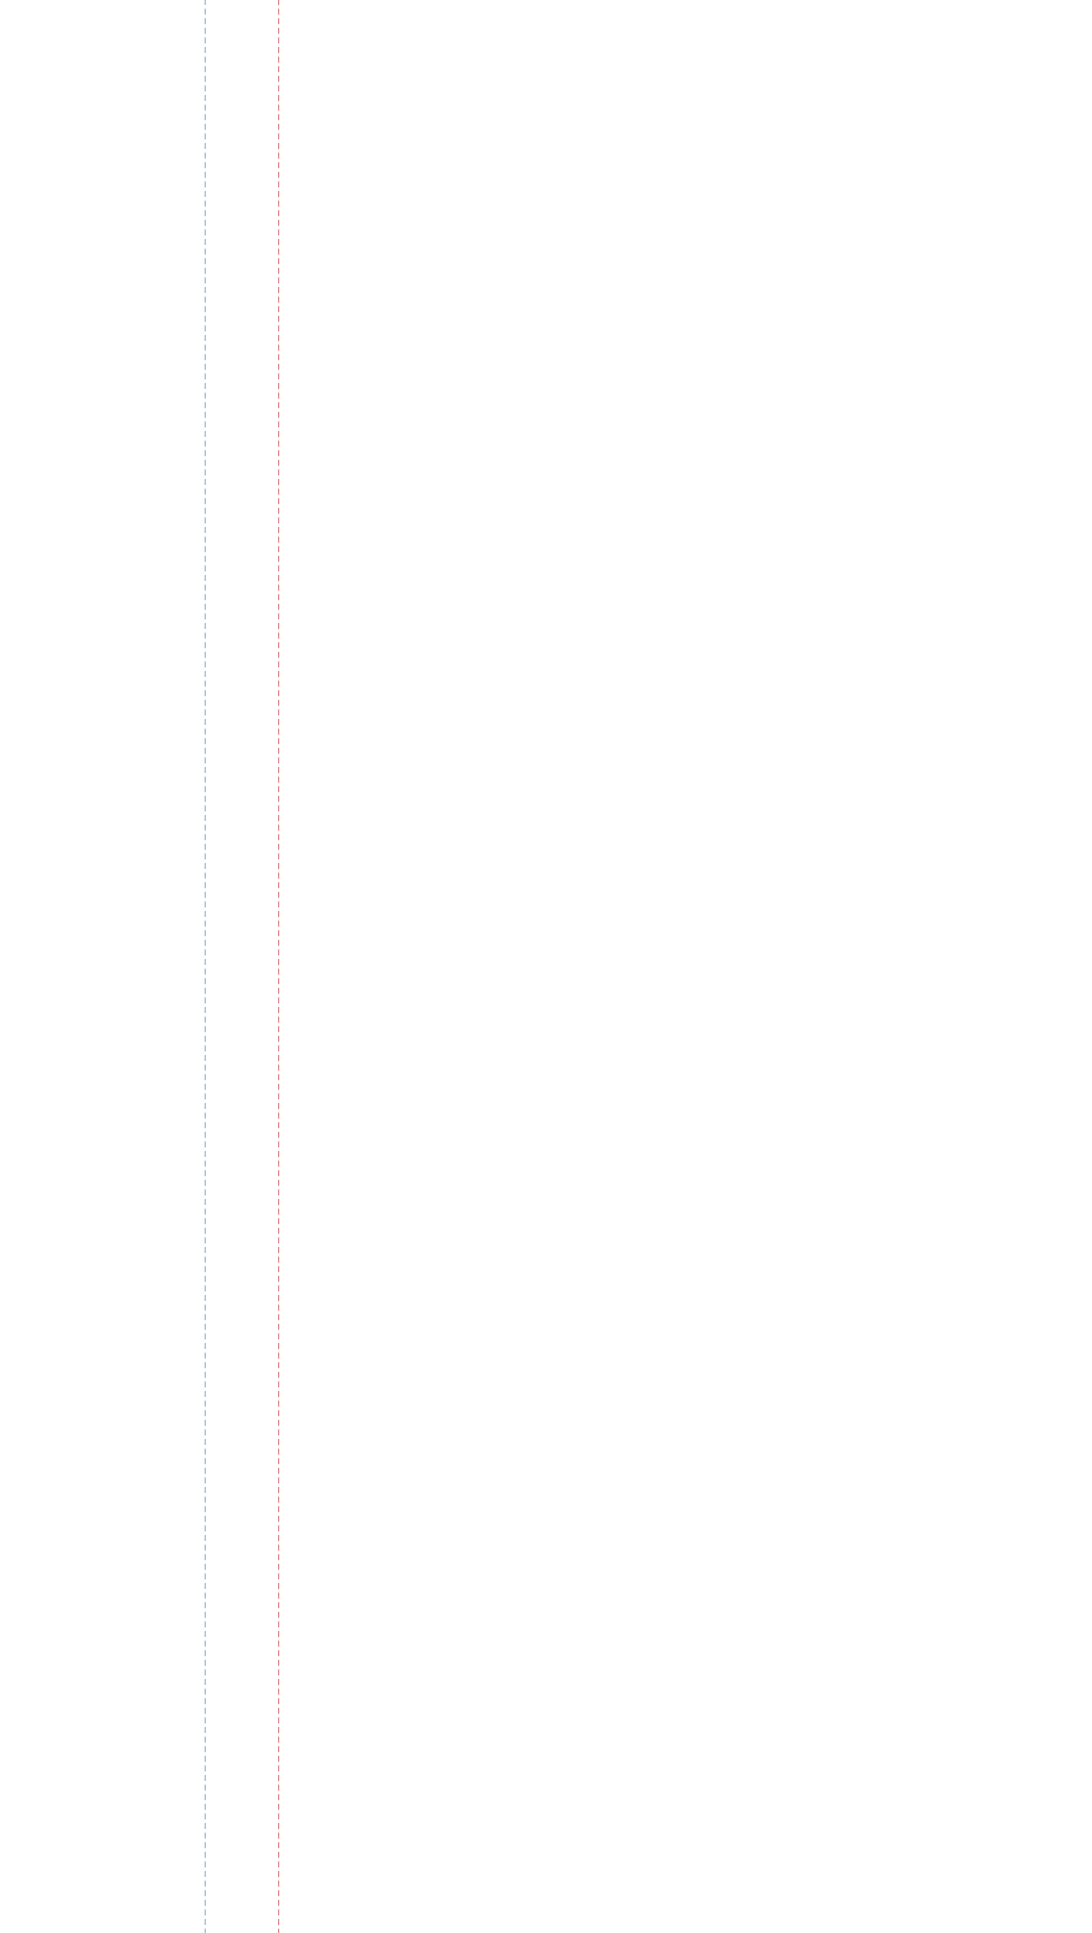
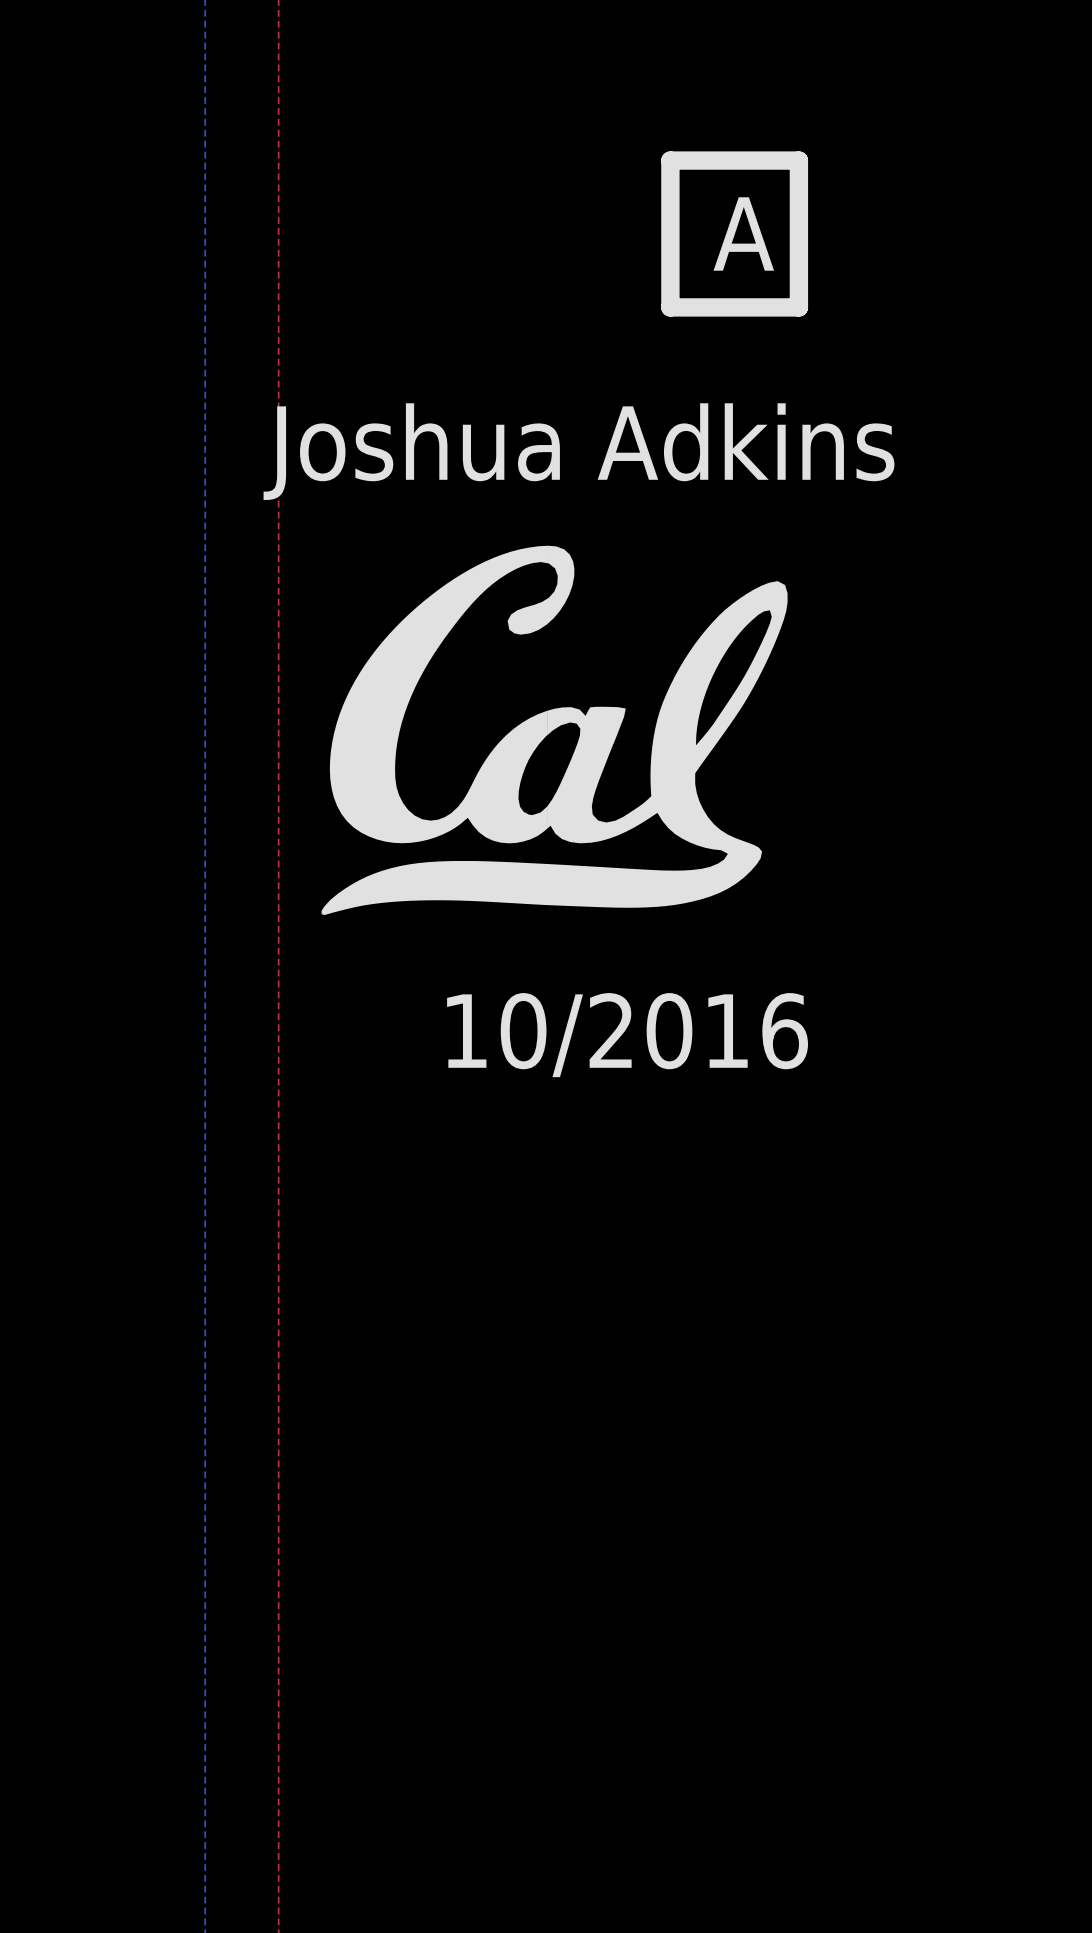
line: none -> (670, 160) (670, 307) (798, 307) (798, 160) (670, 160)
text: none -> A (743, 233)
text: none -> Joshua Adkins (579, 451)
drawing: none -> [321, 545, 788, 916]
text: none -> 10/2016 (627, 1035)

